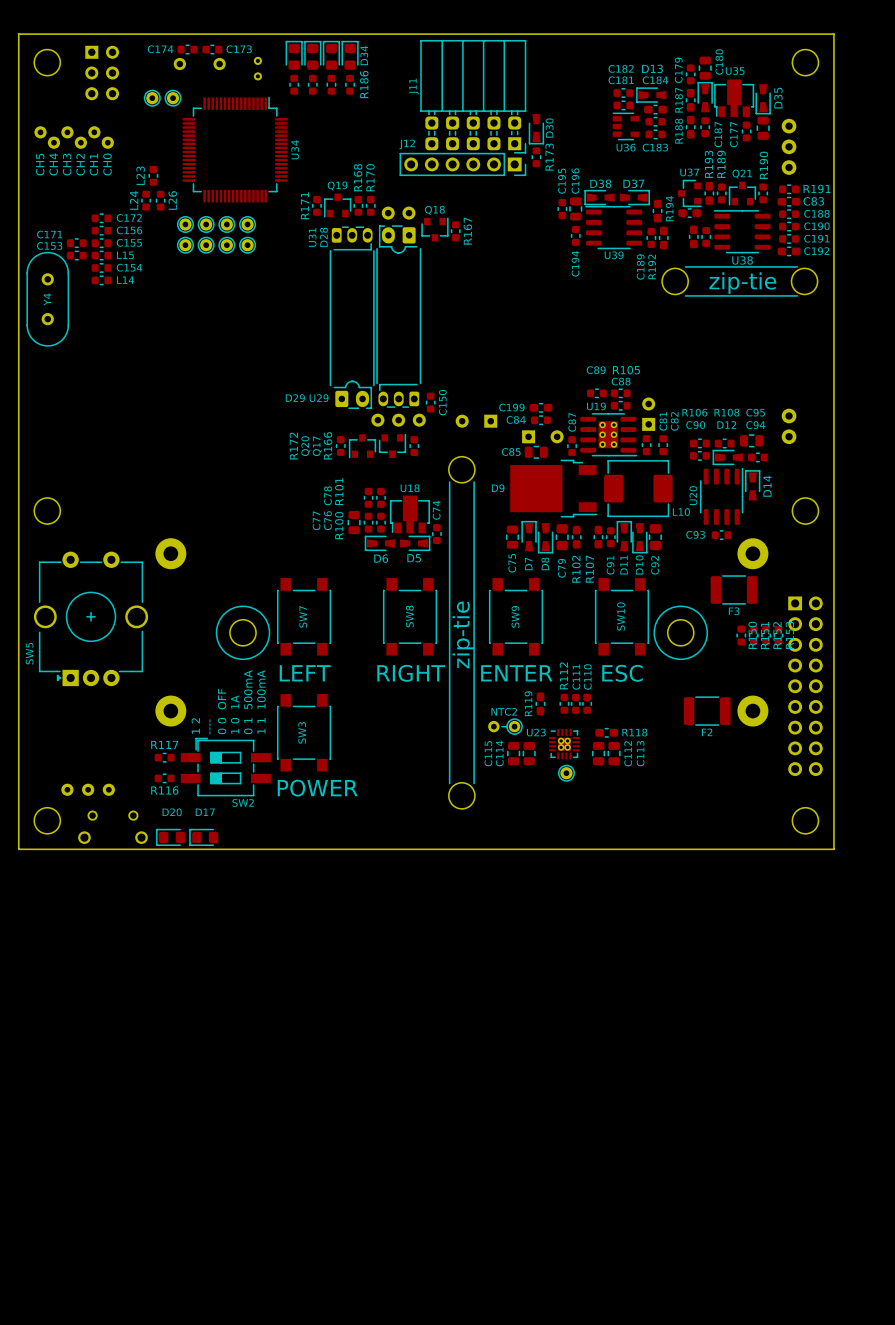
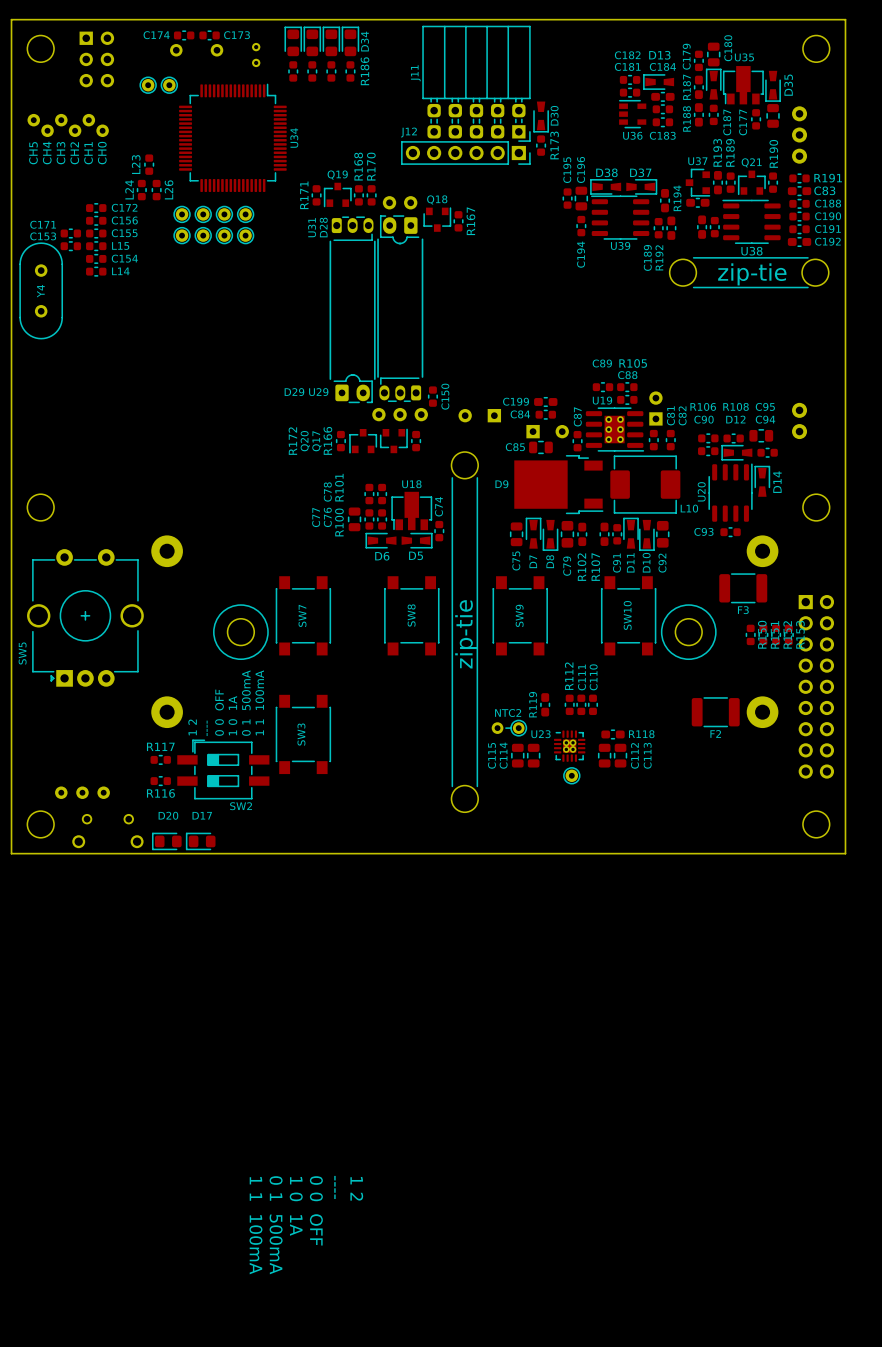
text: LEFT (305, 673) -> none
text: RIGHT (411, 673) -> none
text: ENTER (516, 673) -> none
text: ESC (622, 673) -> none
text: POWER (317, 788) -> none
text: none -> ---- (334, 1187)
text: none -> 1 2 (356, 1188)
text: none -> 1 0 1A (296, 1206)
text: none -> 0 0 OFF (316, 1210)
text: none -> 1 1 100mA (255, 1225)
text: none -> 0 1 500mA (276, 1225)

